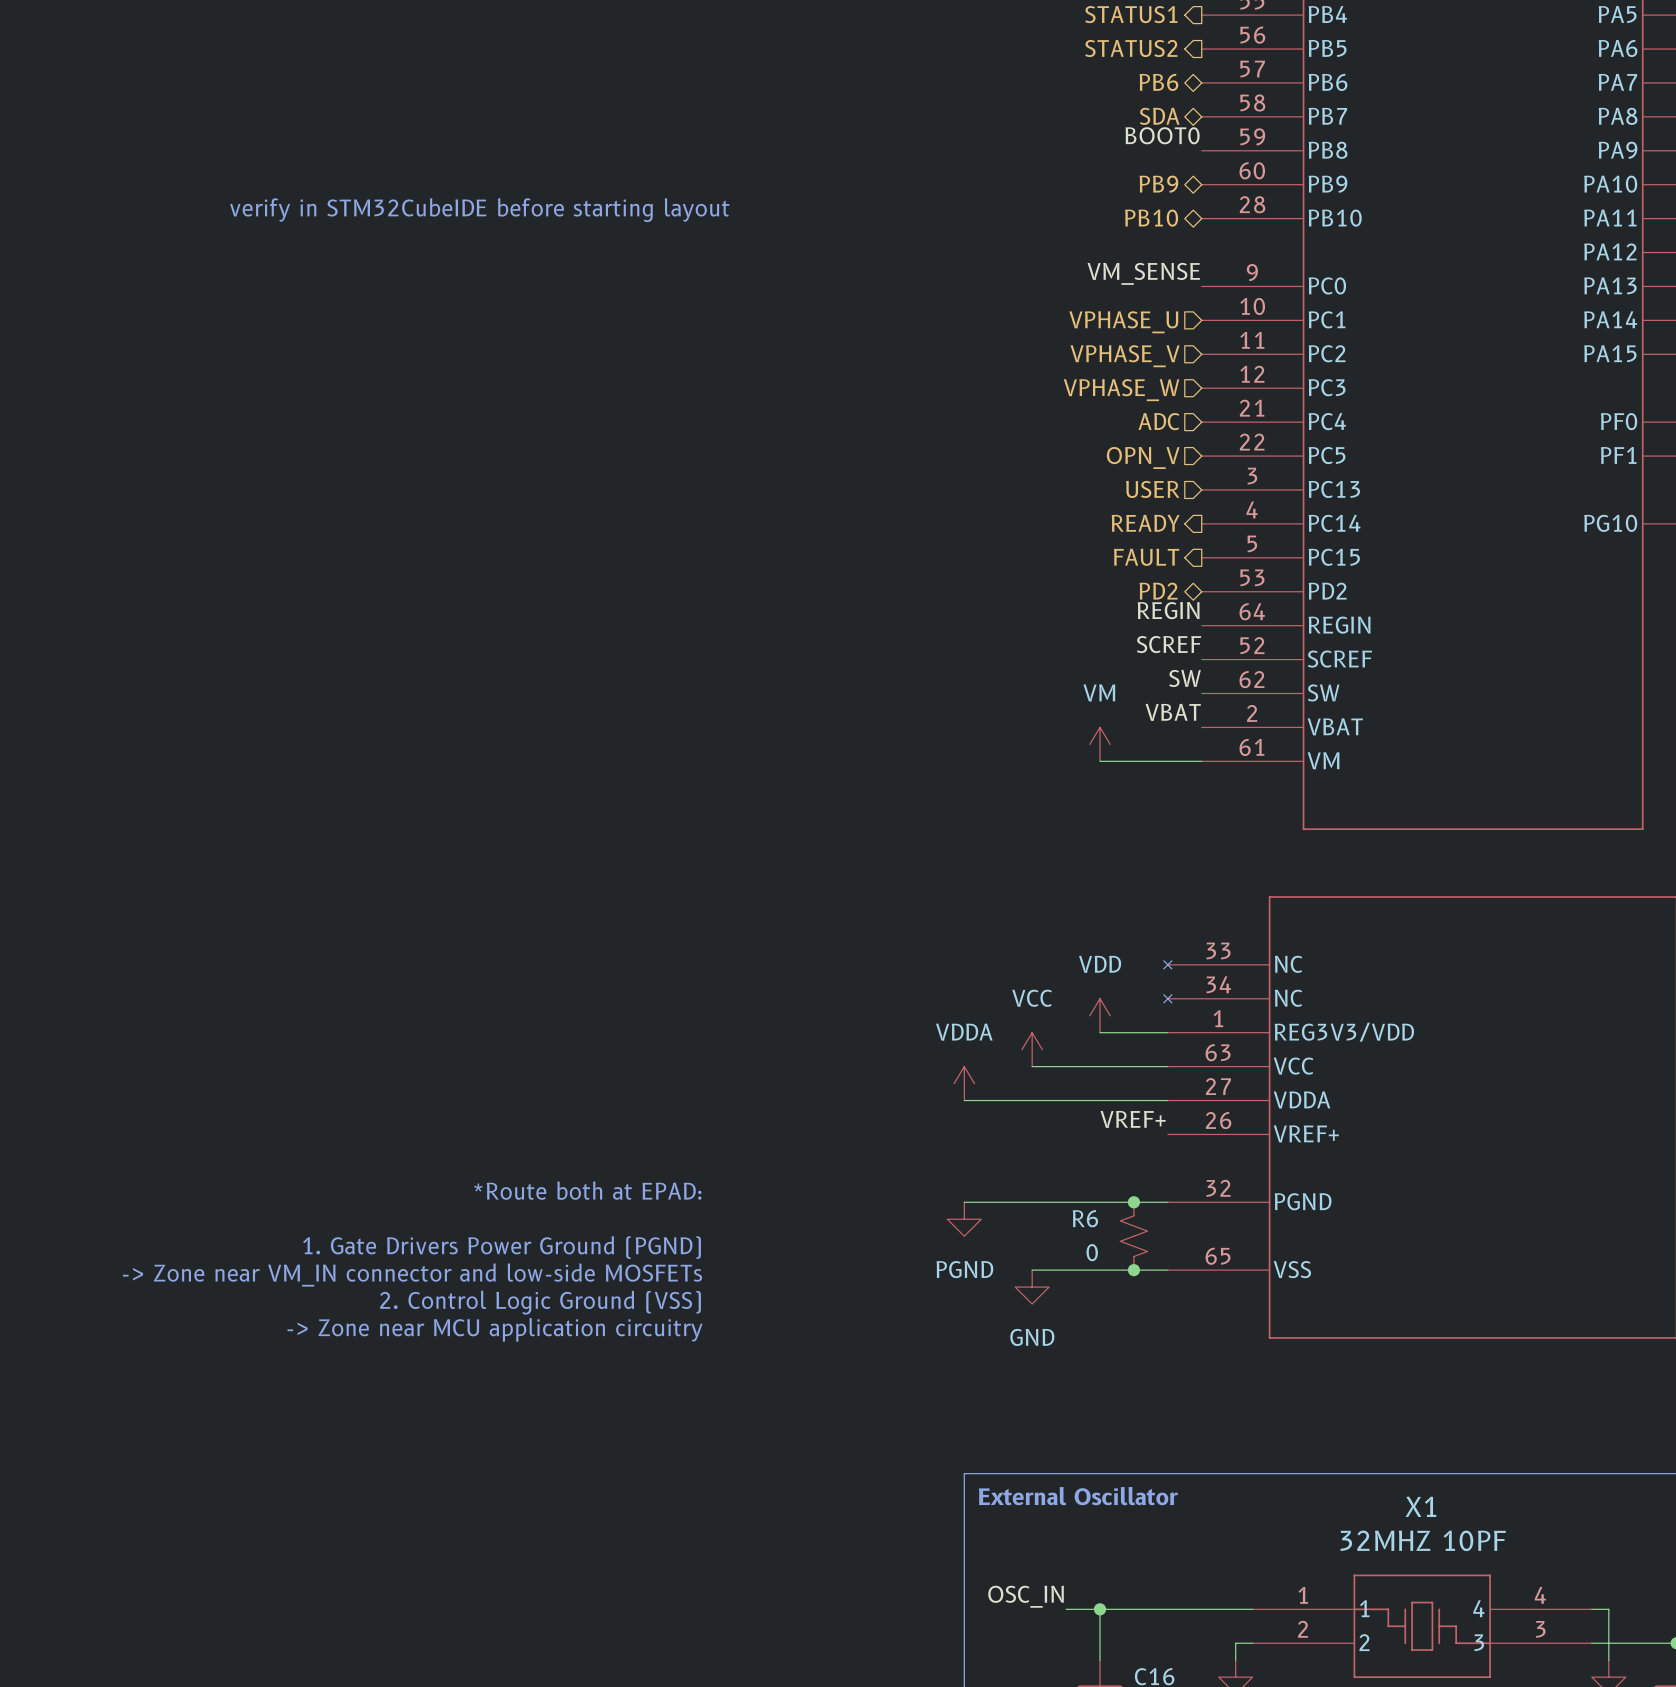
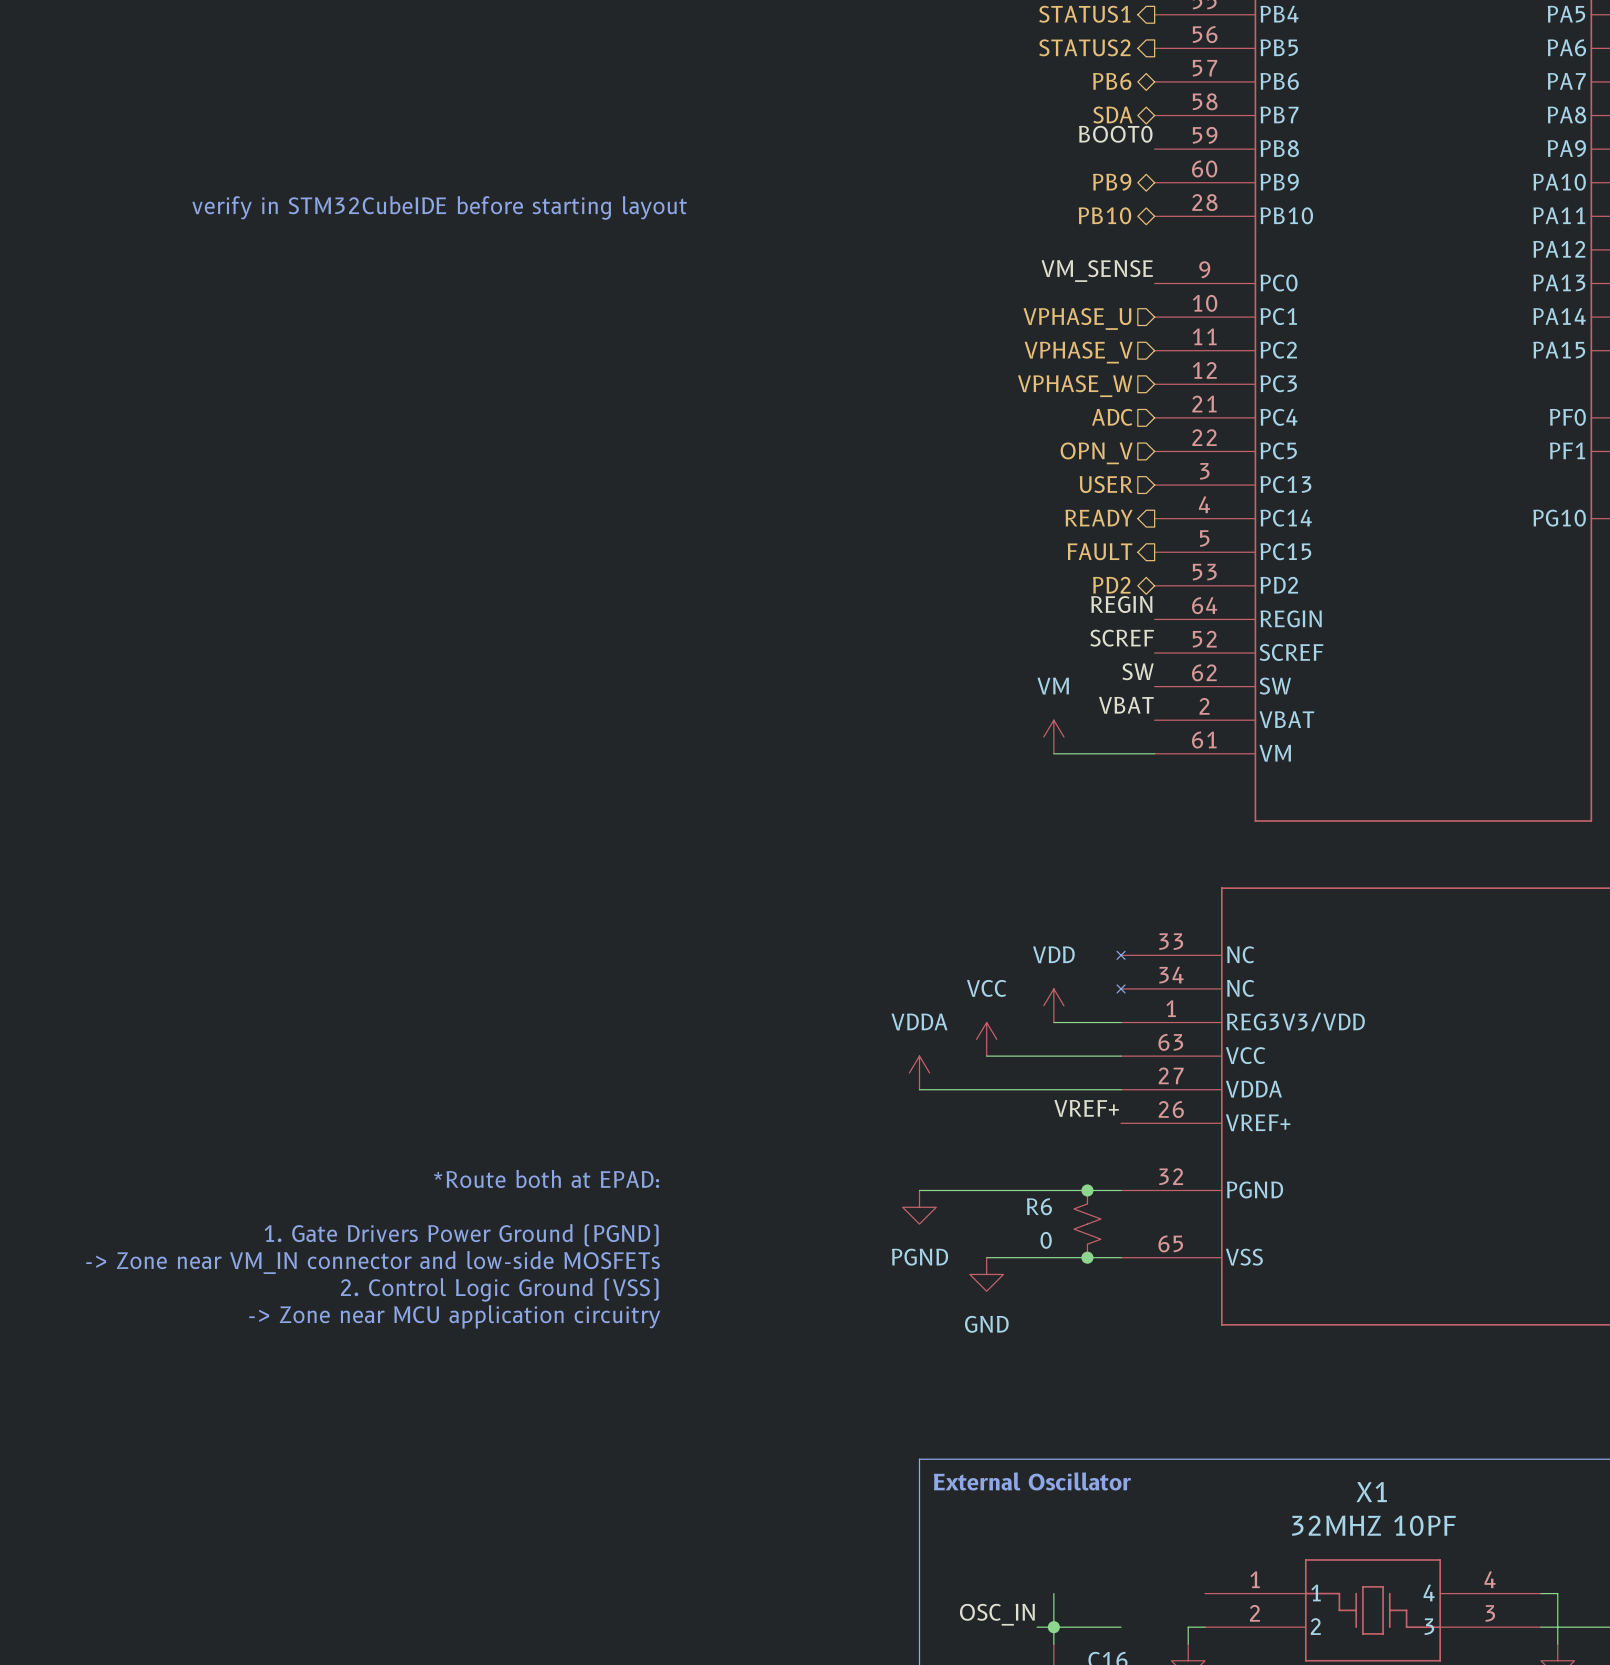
label position: OSC_IN (1026, 1596) -> OSC_IN (997, 1614)
wire: (1066, 1609) (1252, 1609) -> none
junction position: (1100, 1609) -> (1053, 1627)
wire: none -> (1037, 1627) (1121, 1627)

